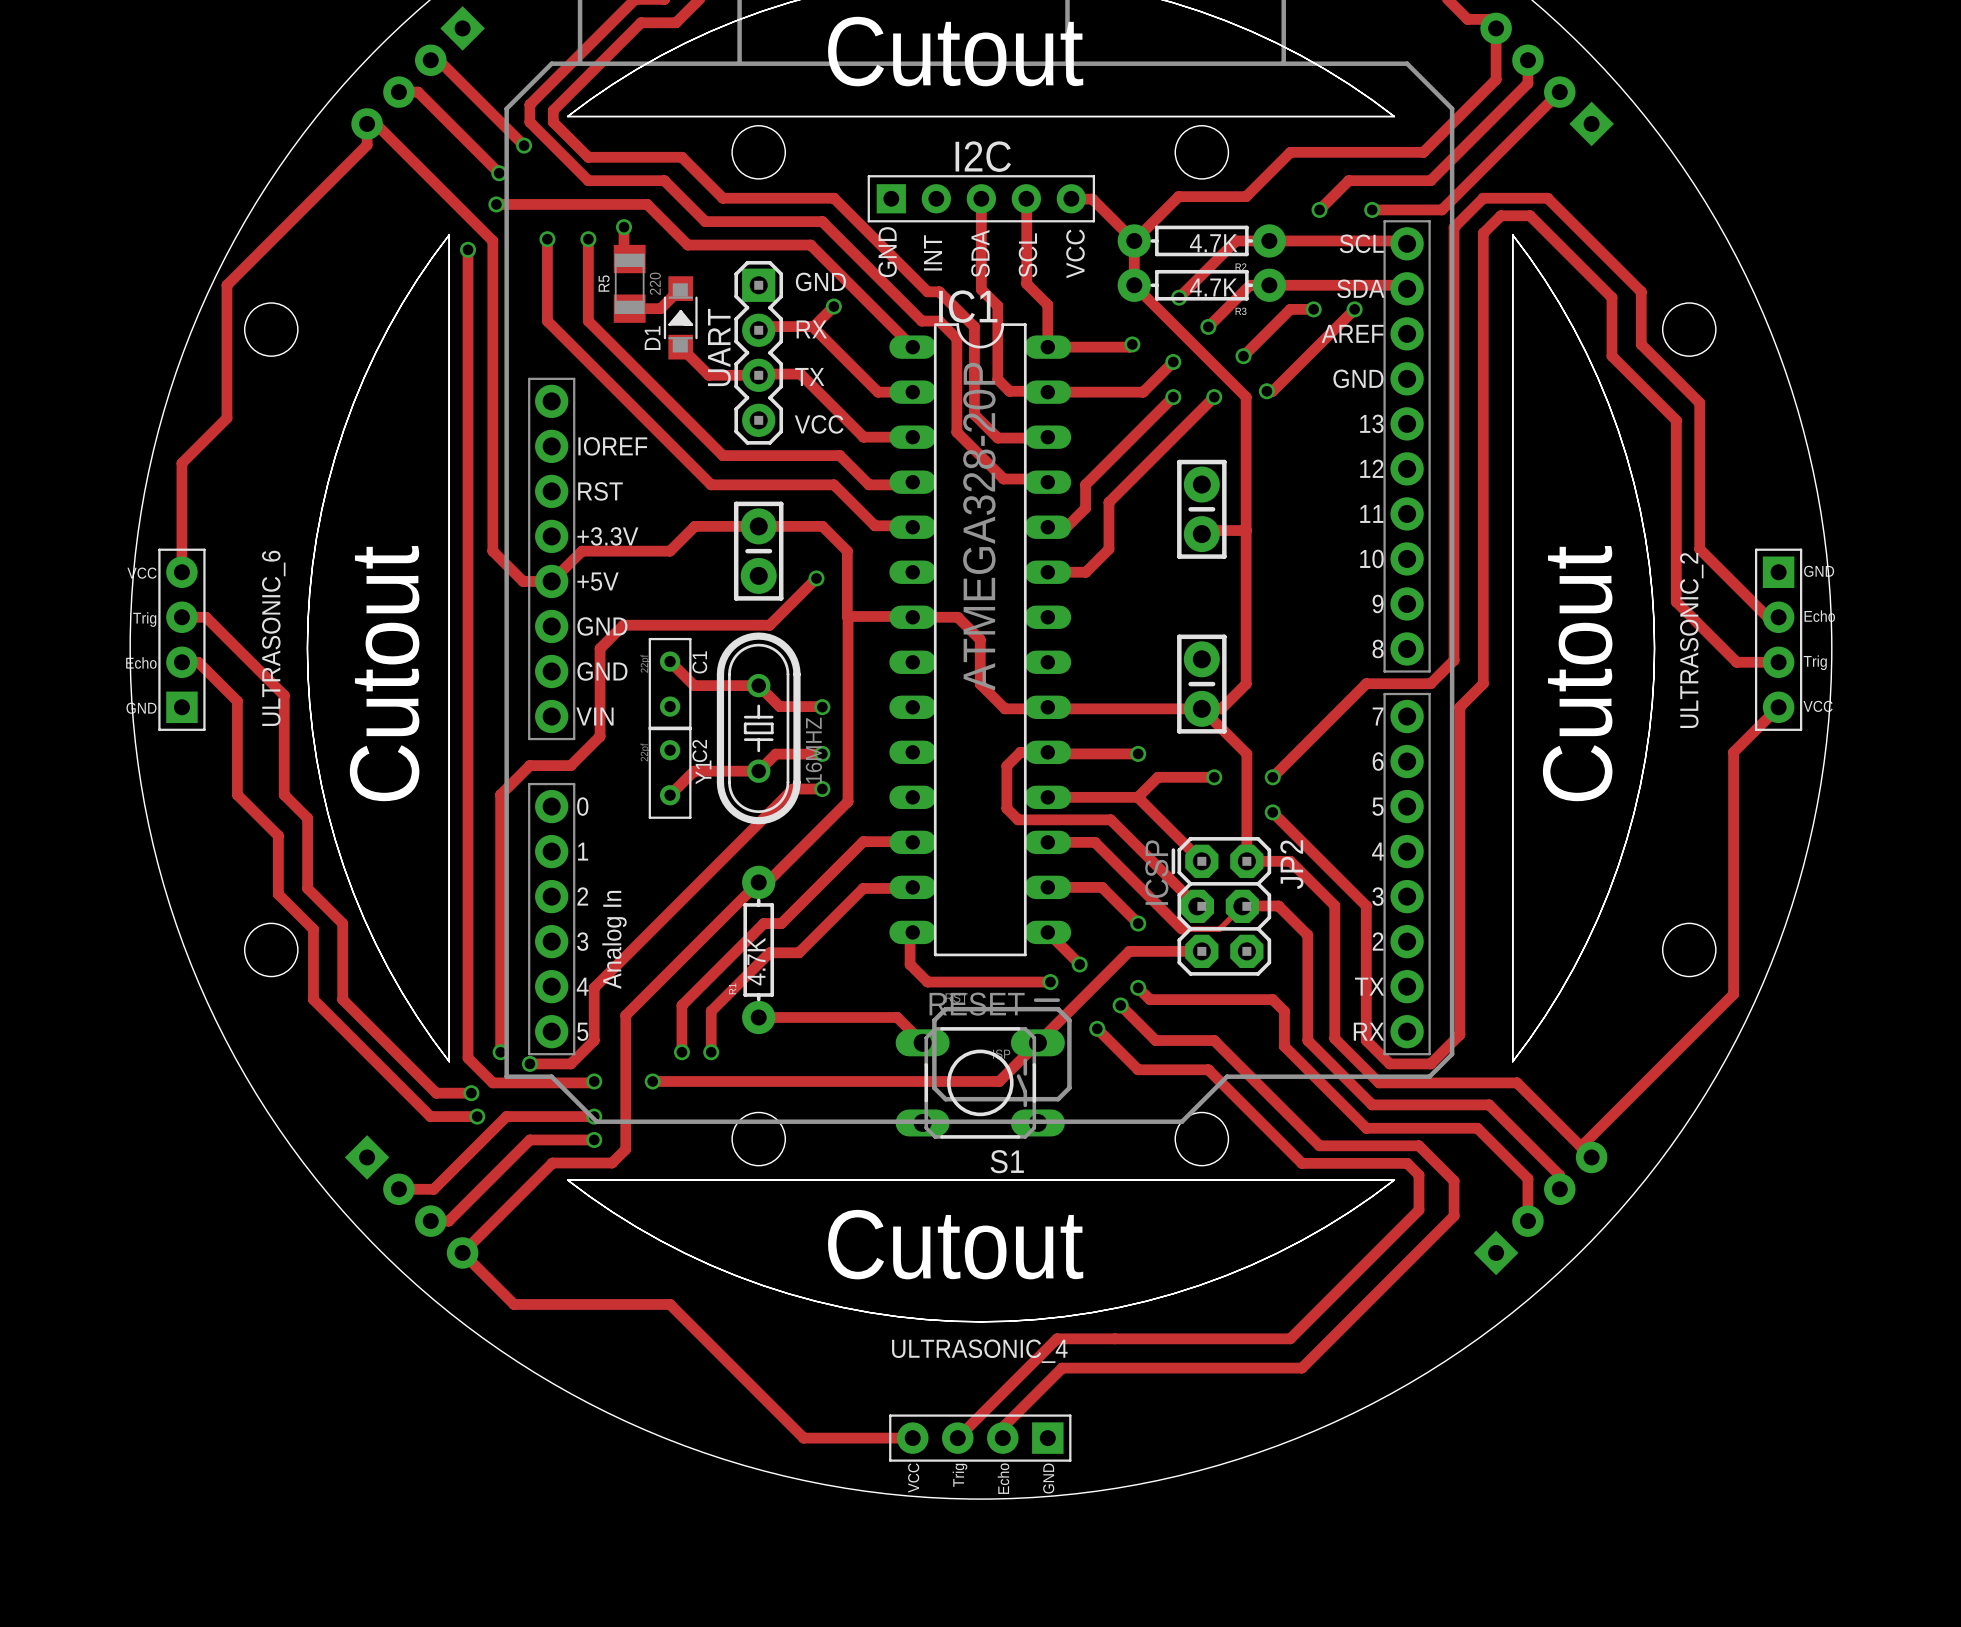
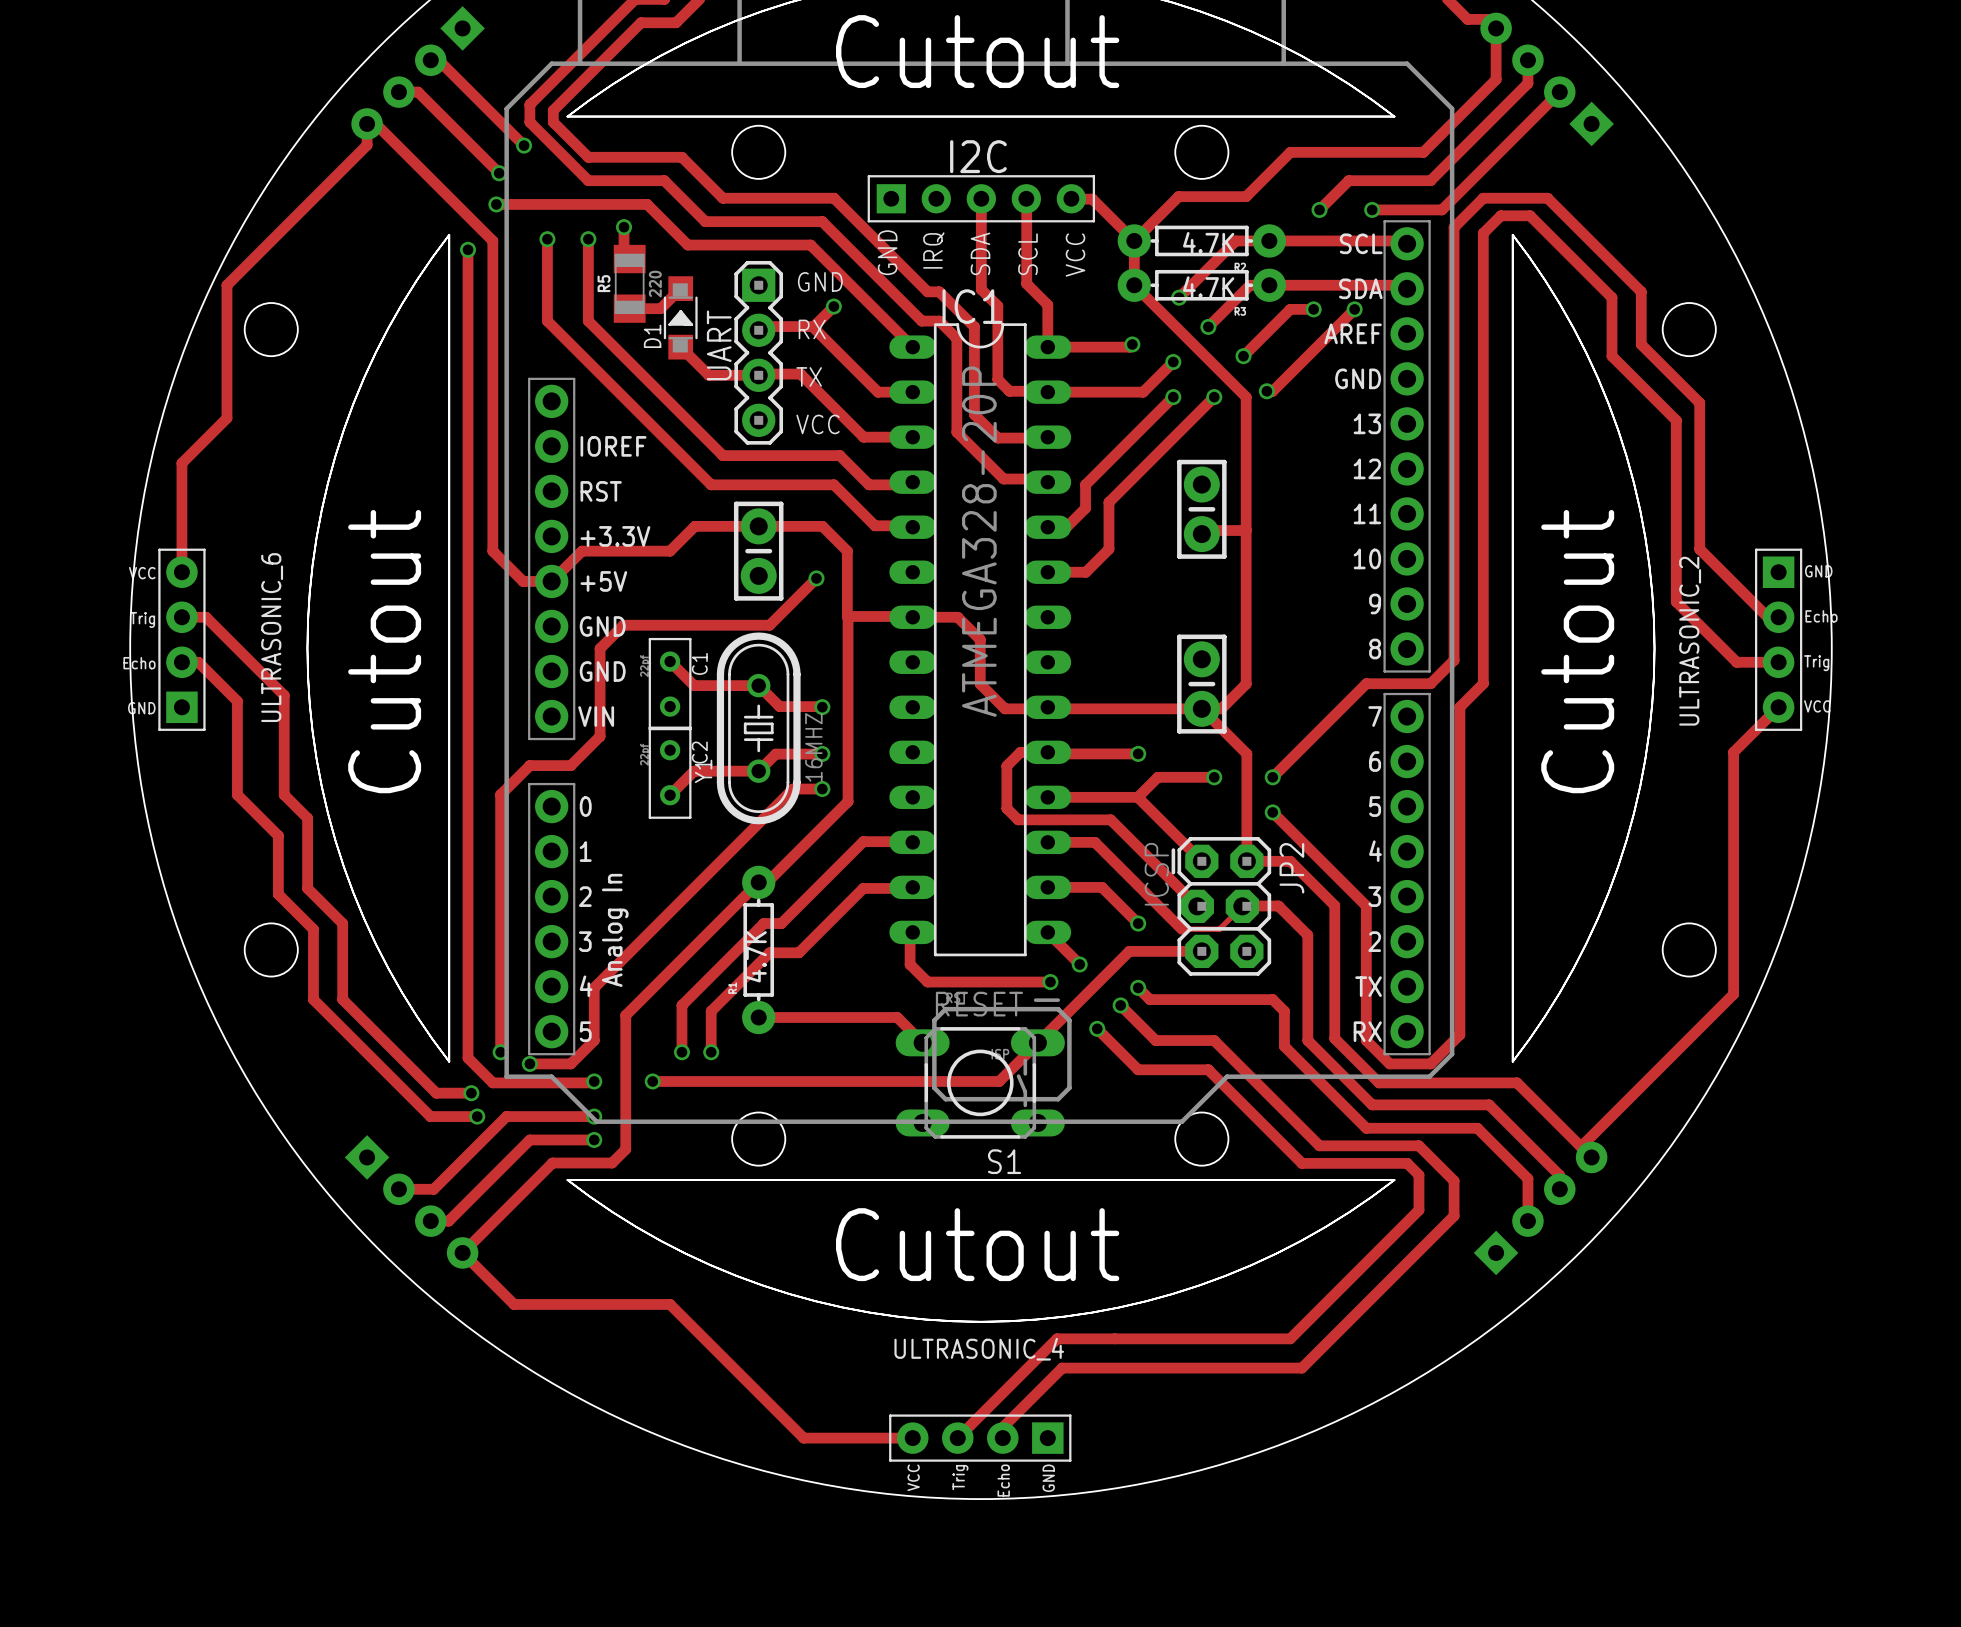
text: INT (932, 252) -> IRQ (933, 250)

